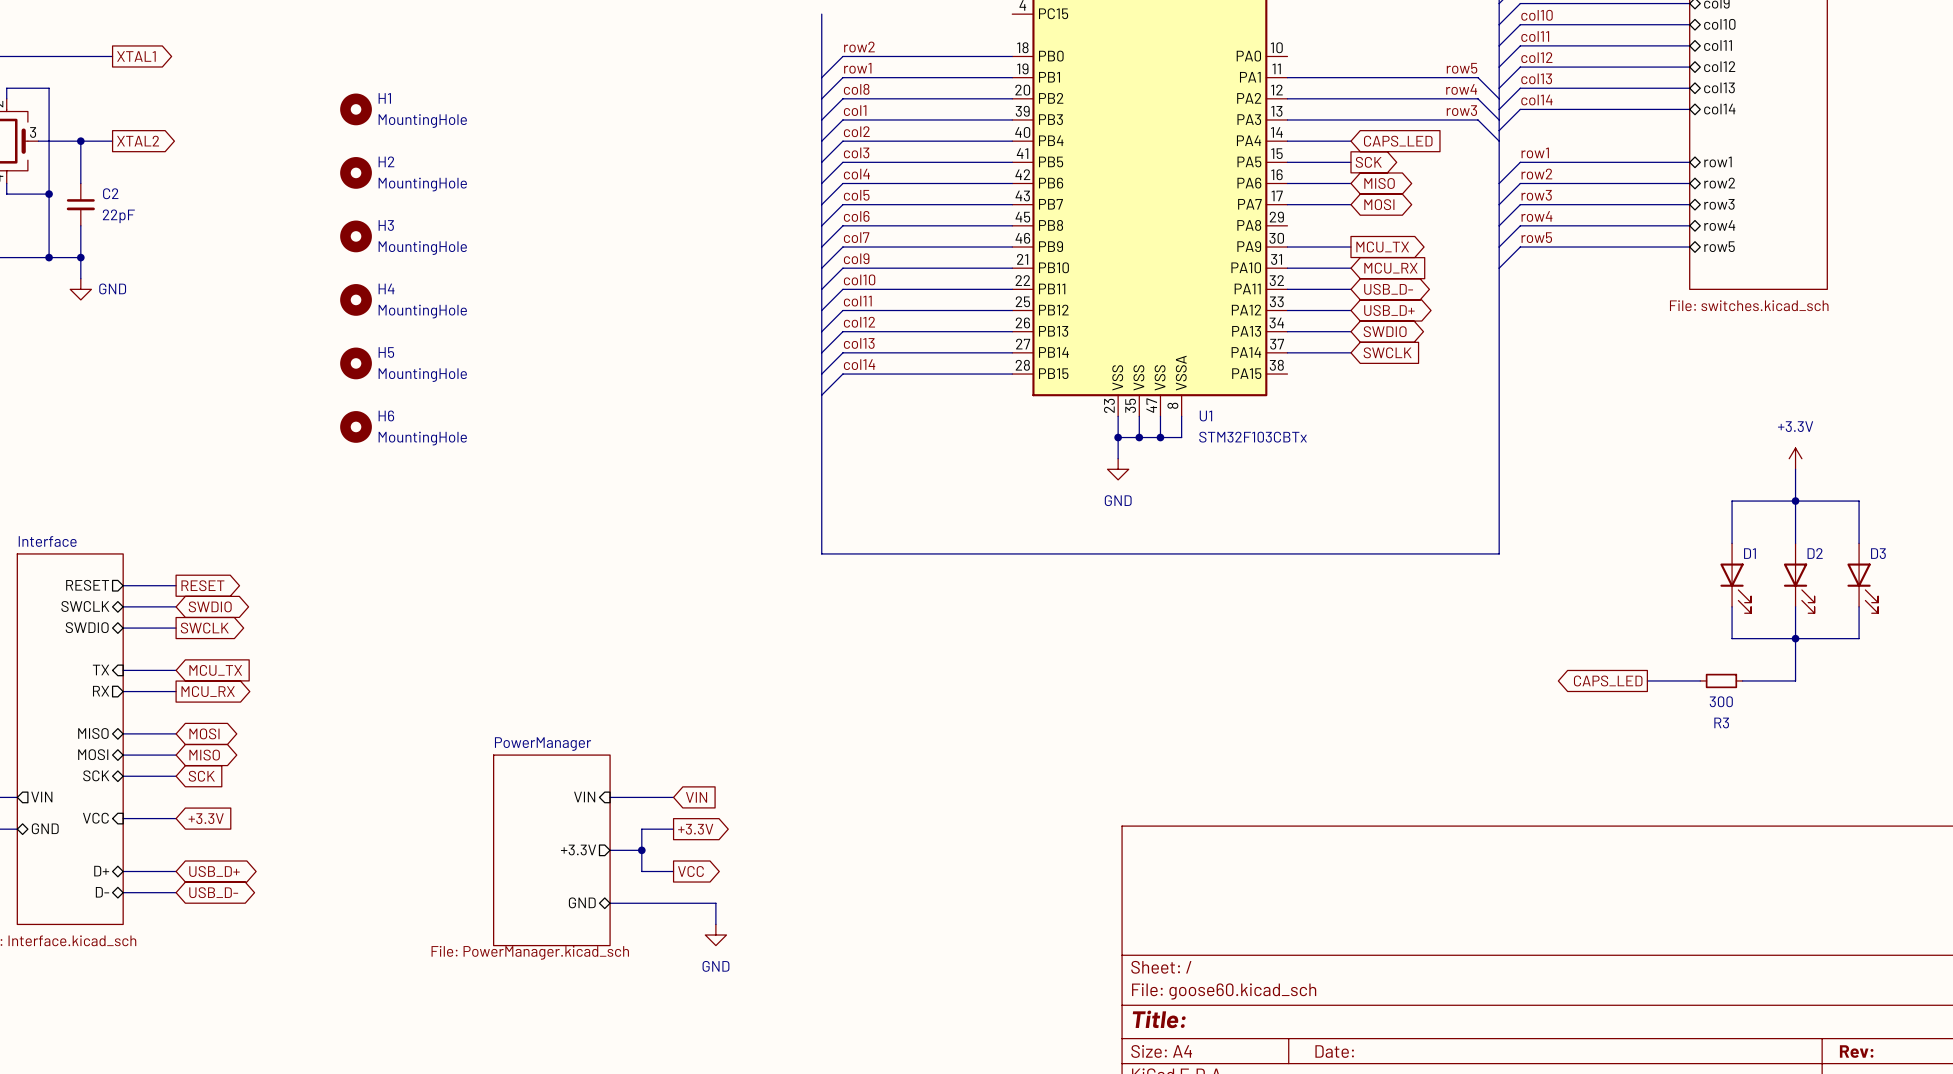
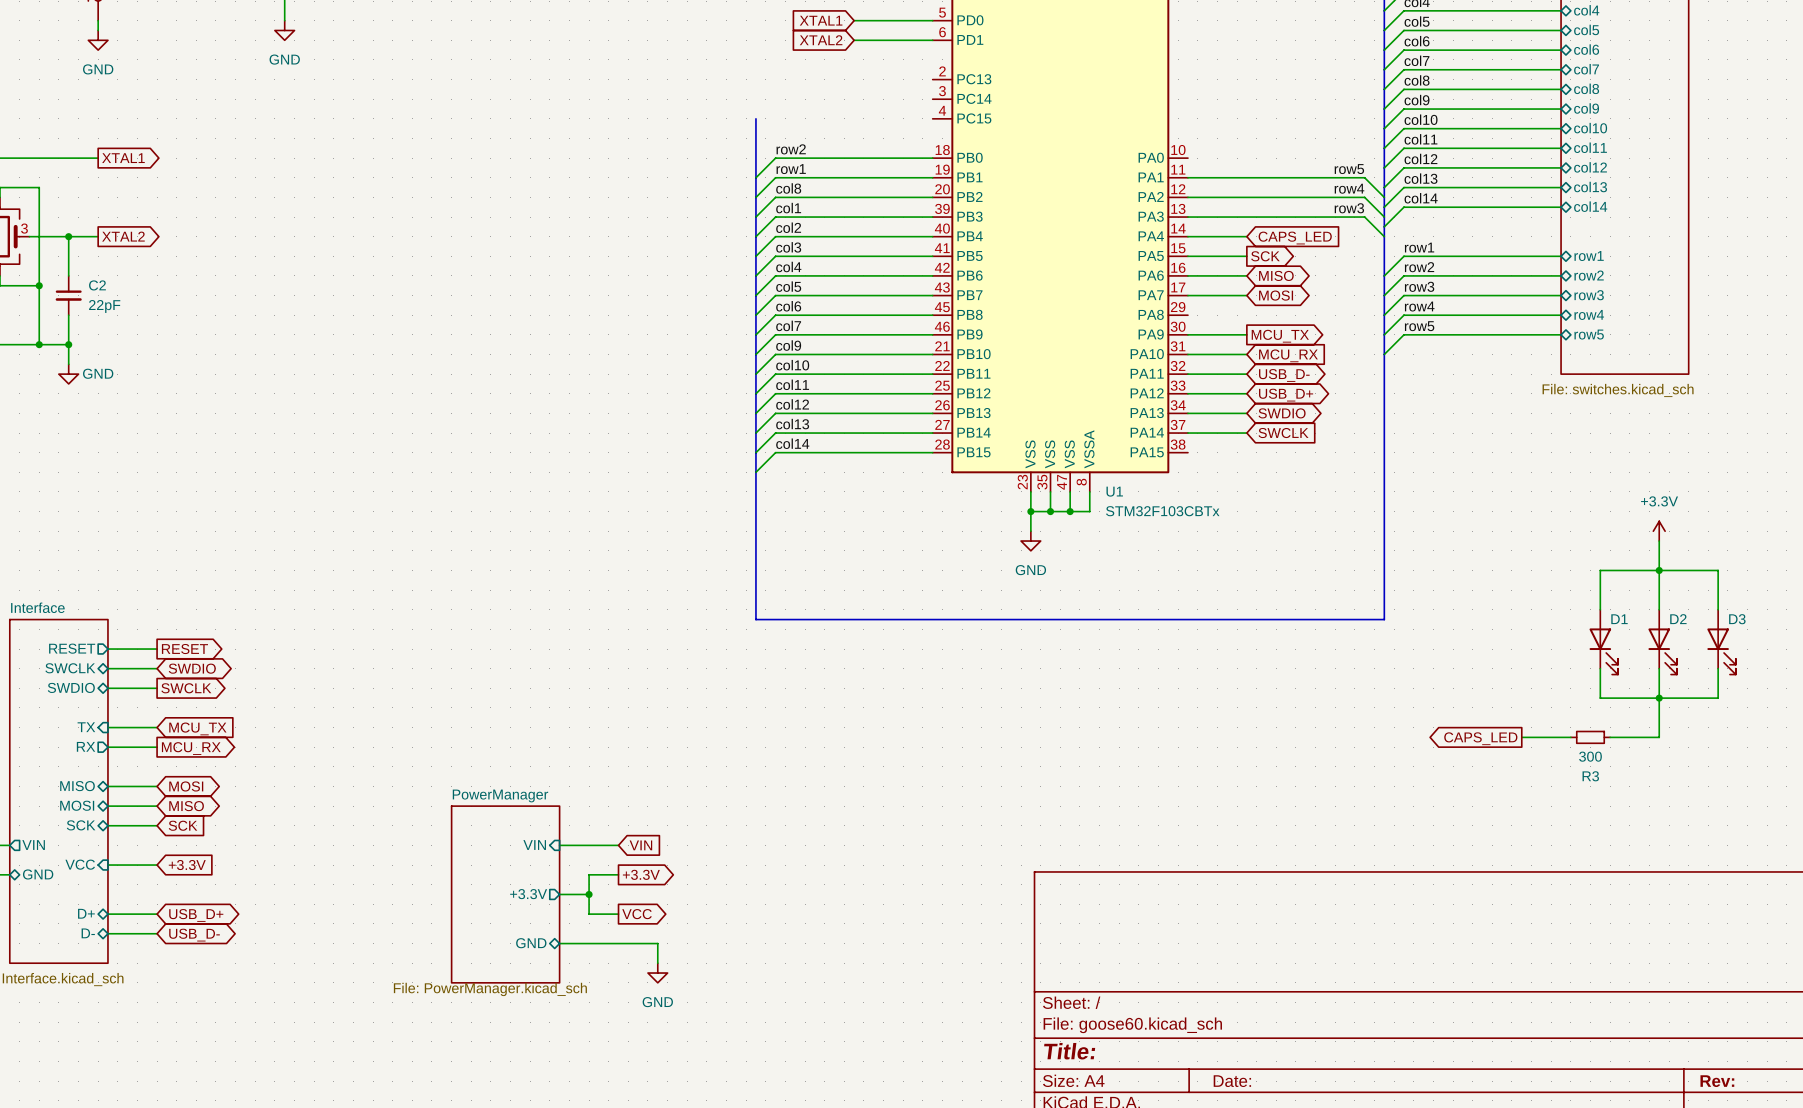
H1: MountingHole (356, 109) -> none
H2: MountingHole (356, 172) -> none
H3: MountingHole (356, 236) -> none
H4: MountingHole (356, 299) -> none
H5: MountingHole (356, 363) -> none
H6: MountingHole (356, 426) -> none

